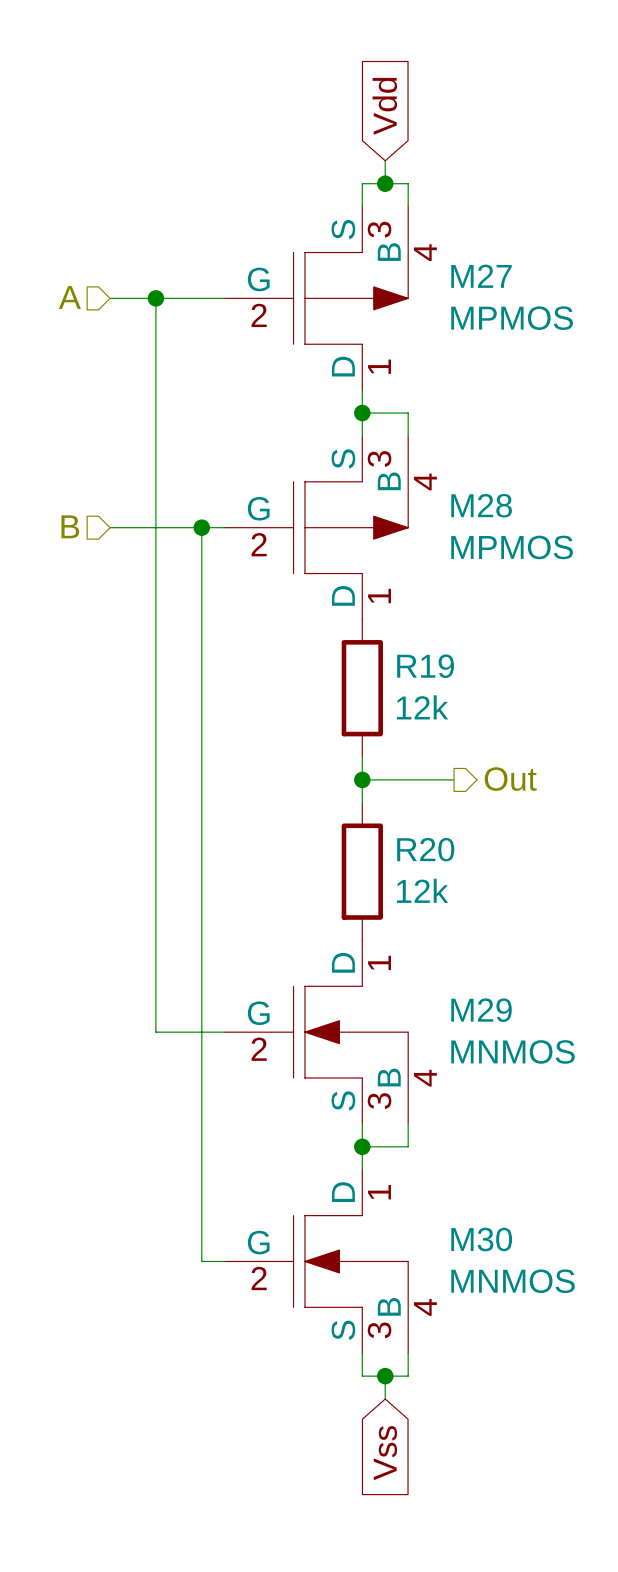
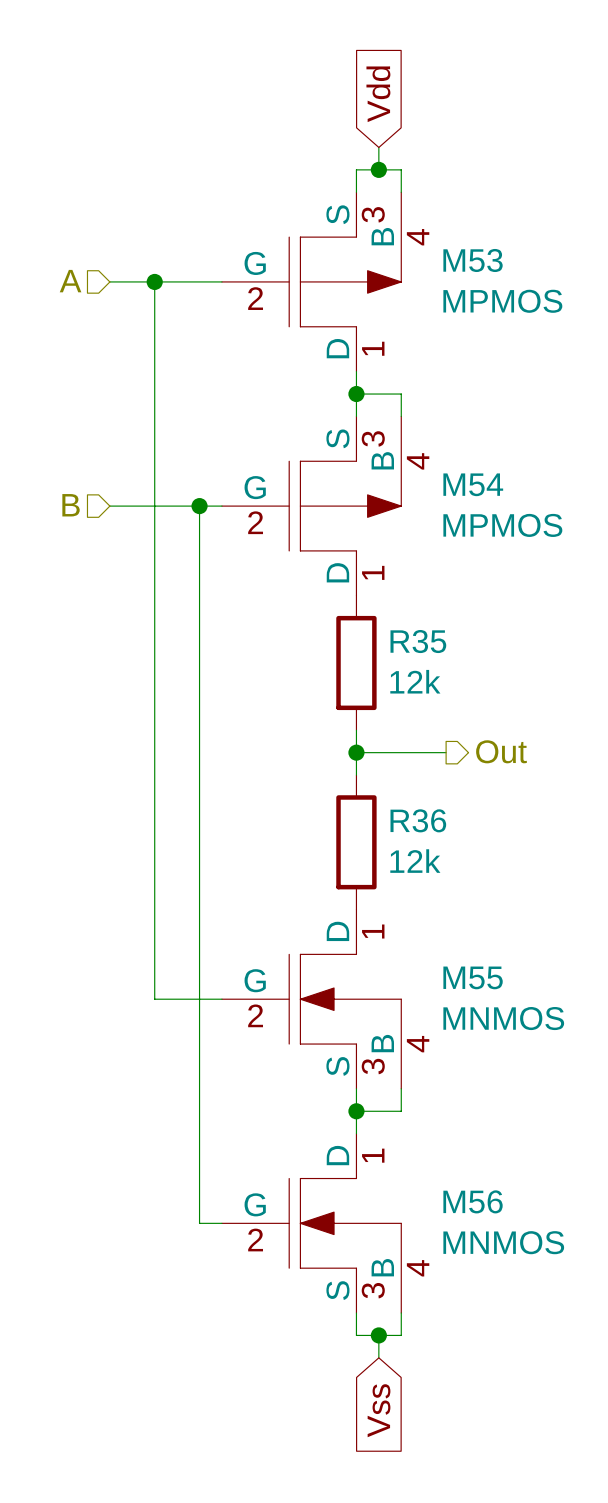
M27 name: M27 (481, 276) -> M53 (473, 260)
M28 name: M28 (481, 505) -> M54 (473, 484)
R19 name: R19 (425, 666) -> R35 (418, 641)
R20 name: R20 (425, 849) -> R36 (418, 820)
M29 name: M29 (481, 1010) -> M55 (473, 977)
M30 name: M30 (481, 1239) -> M56 (473, 1201)

